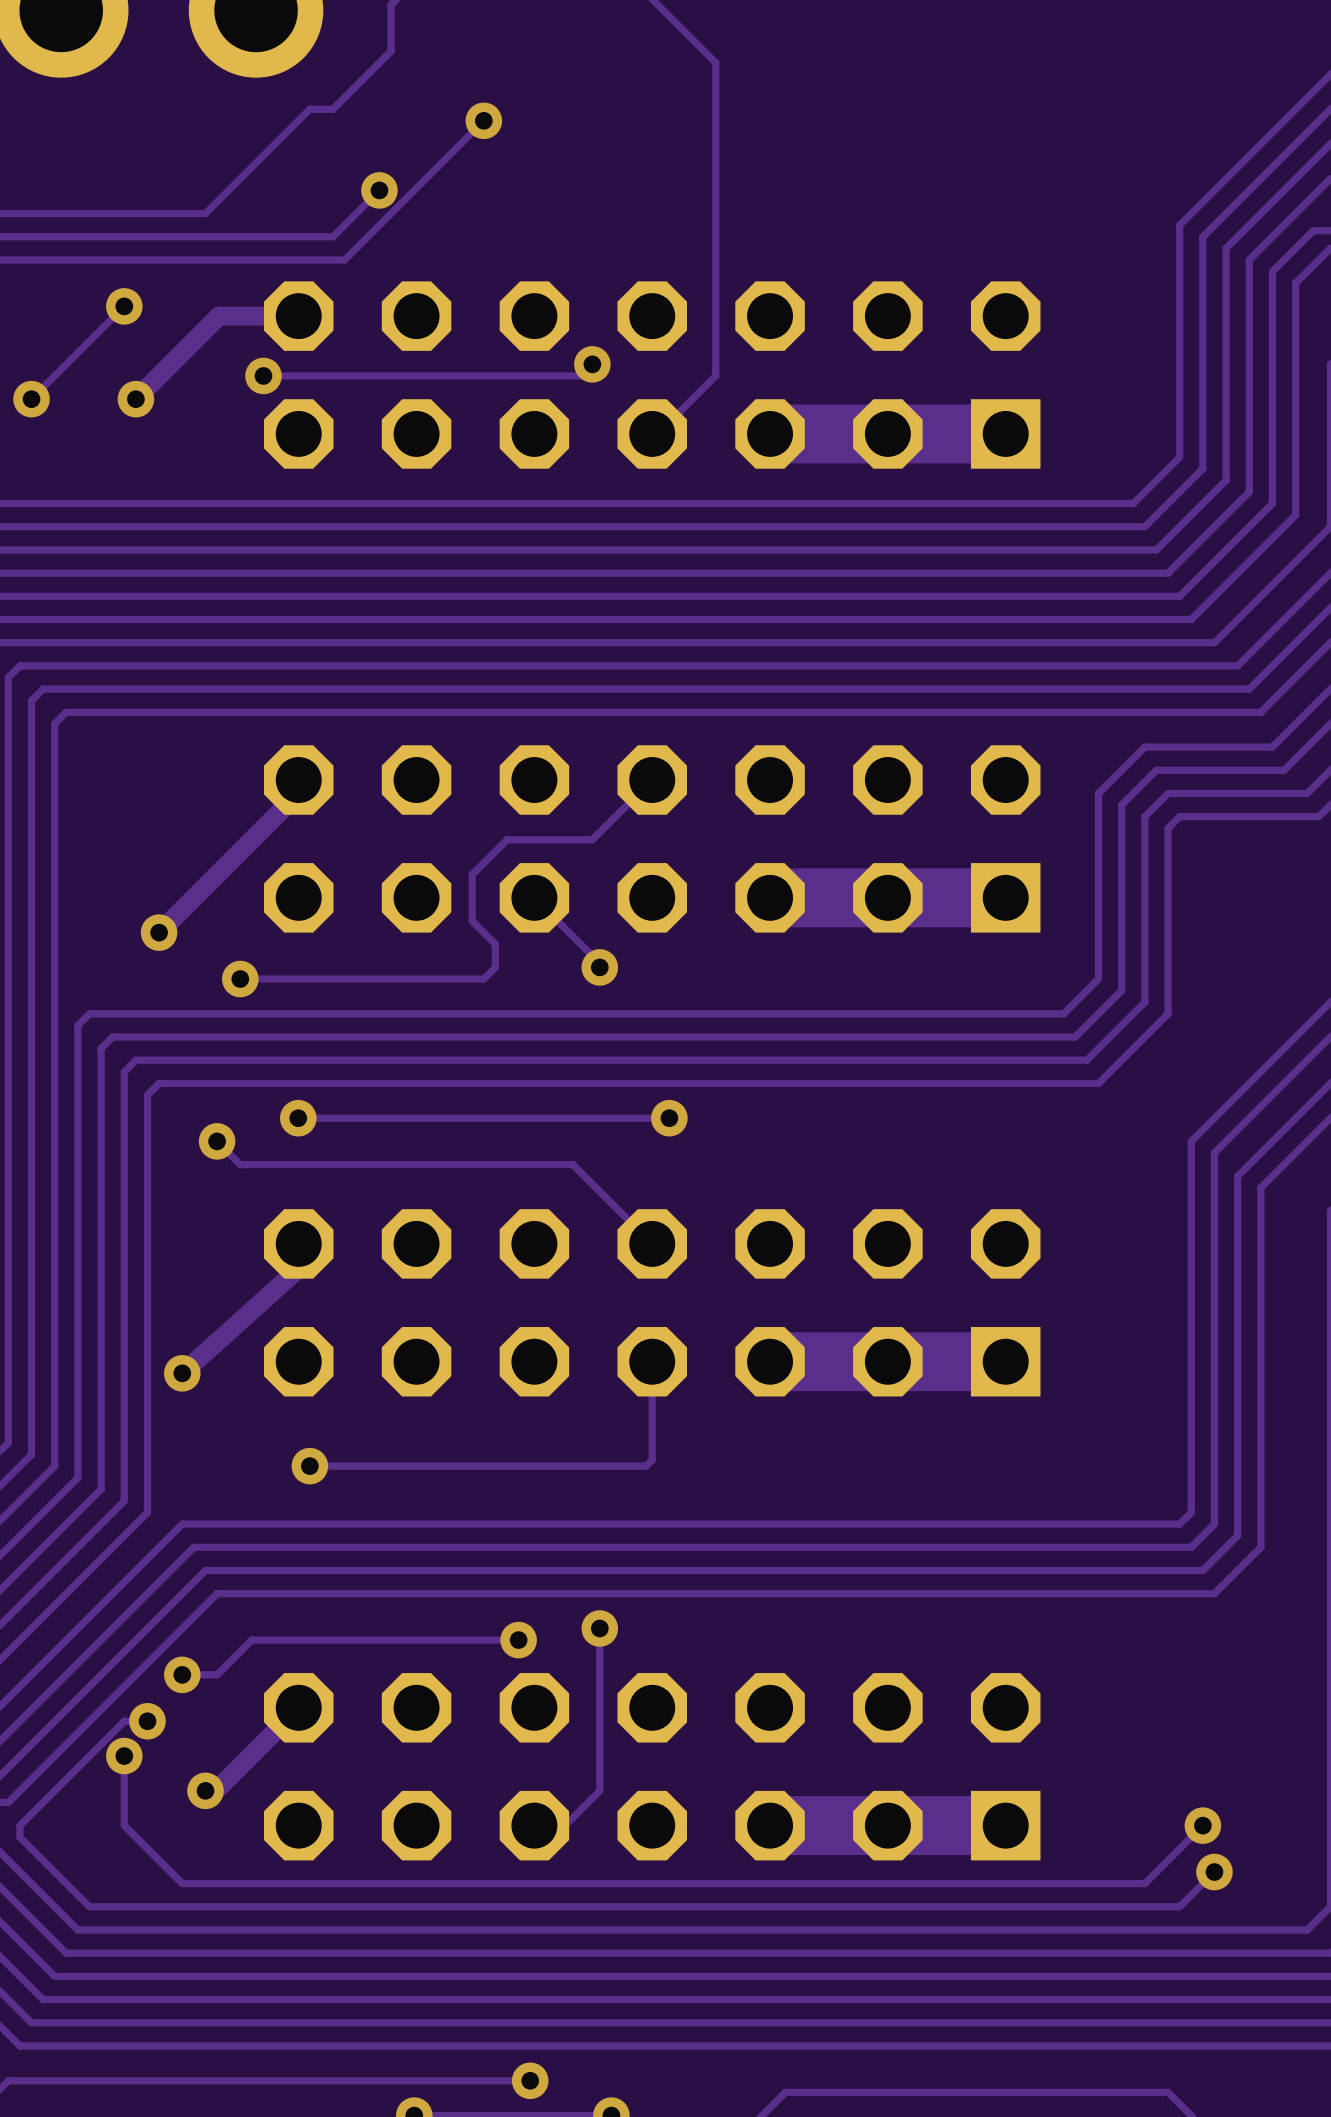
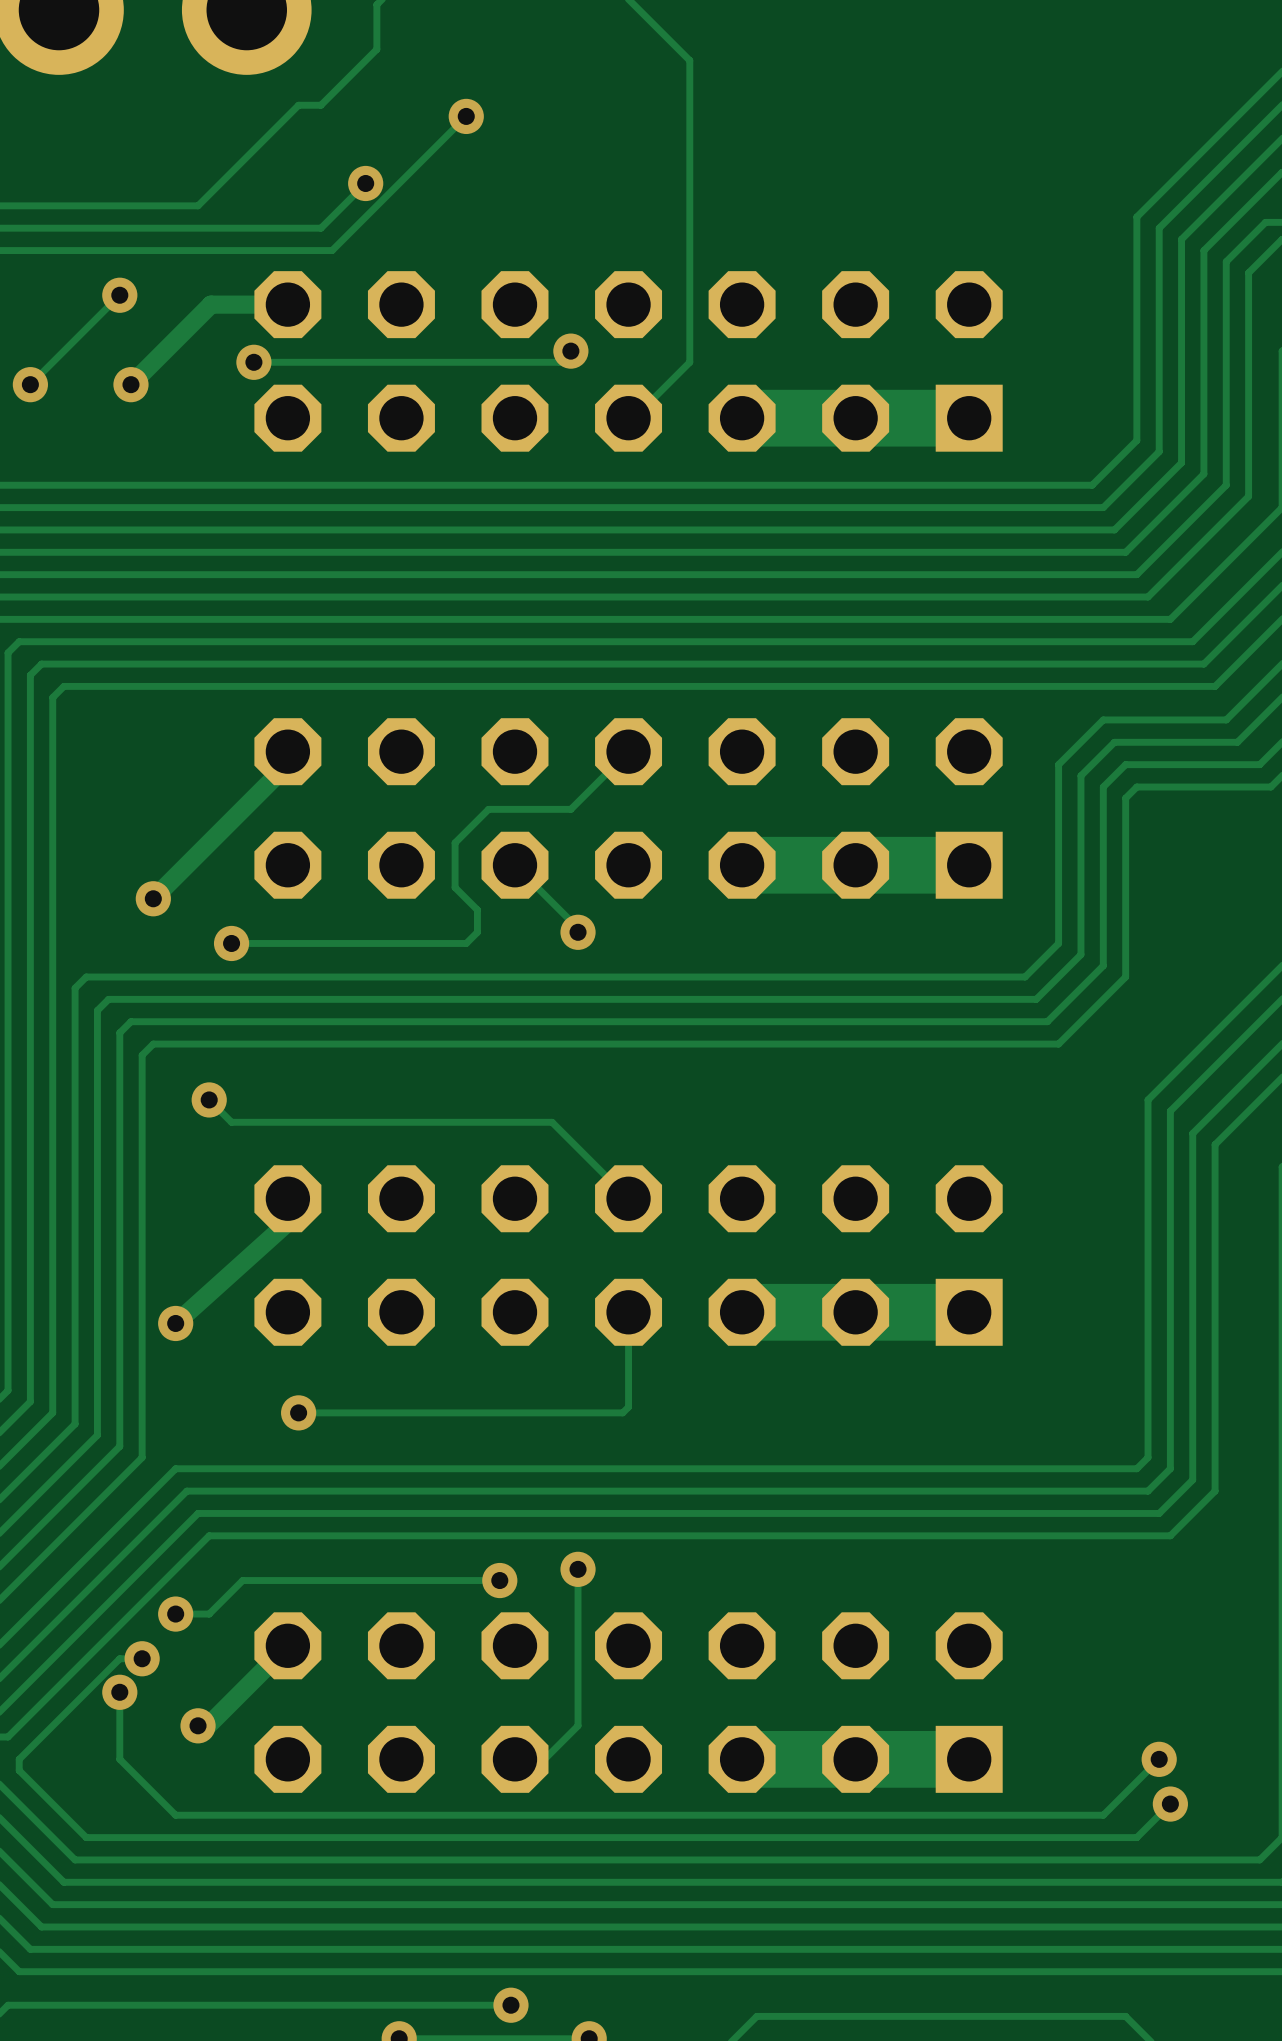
via: (298, 1118) -> none
track: (669, 1118) (298, 1118) -> none
via: (669, 1118) -> none

